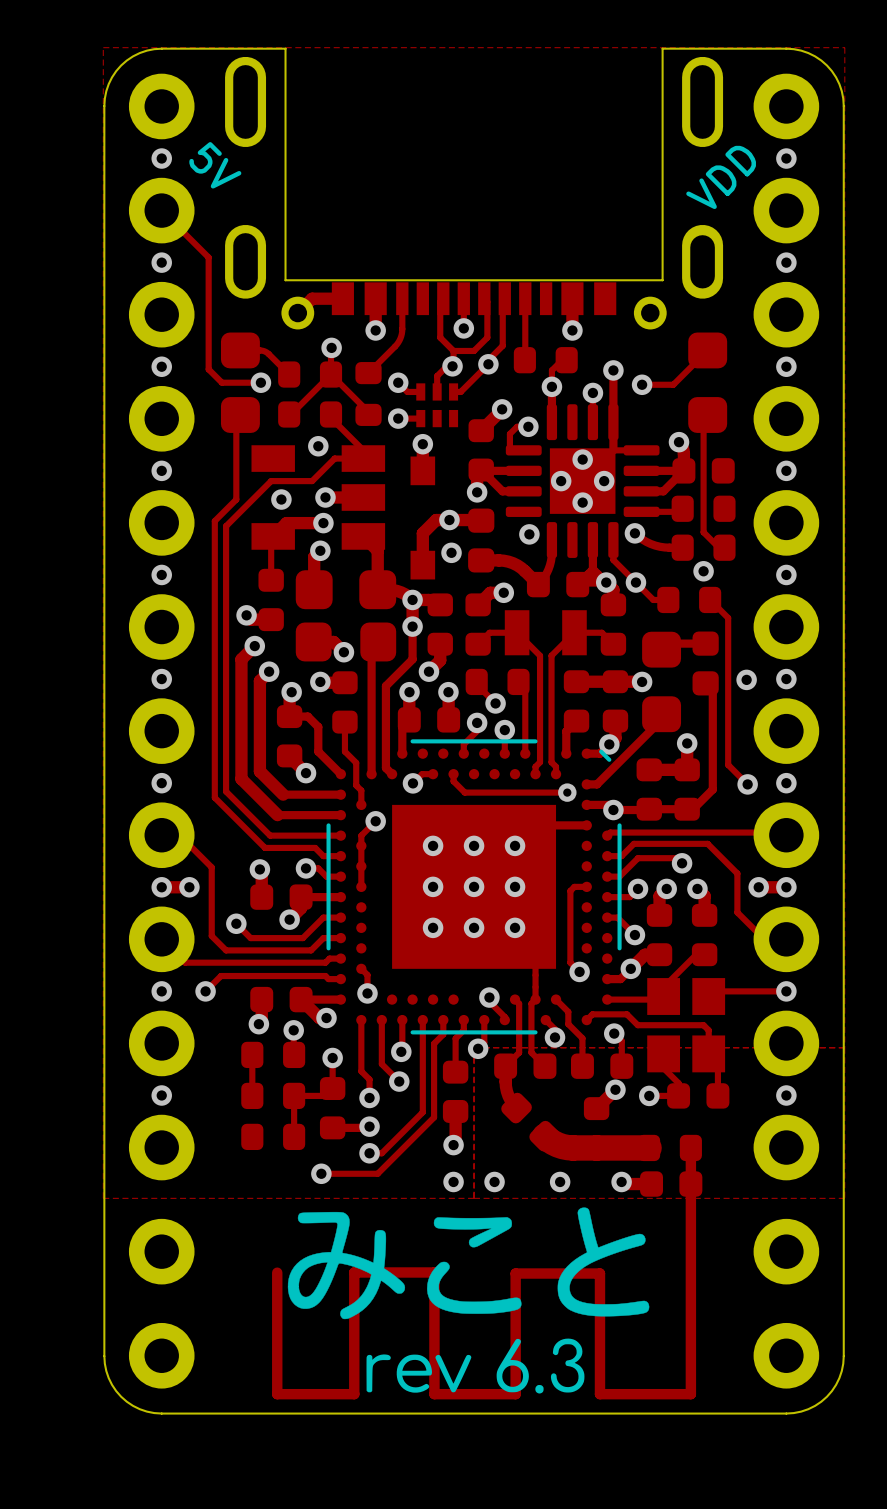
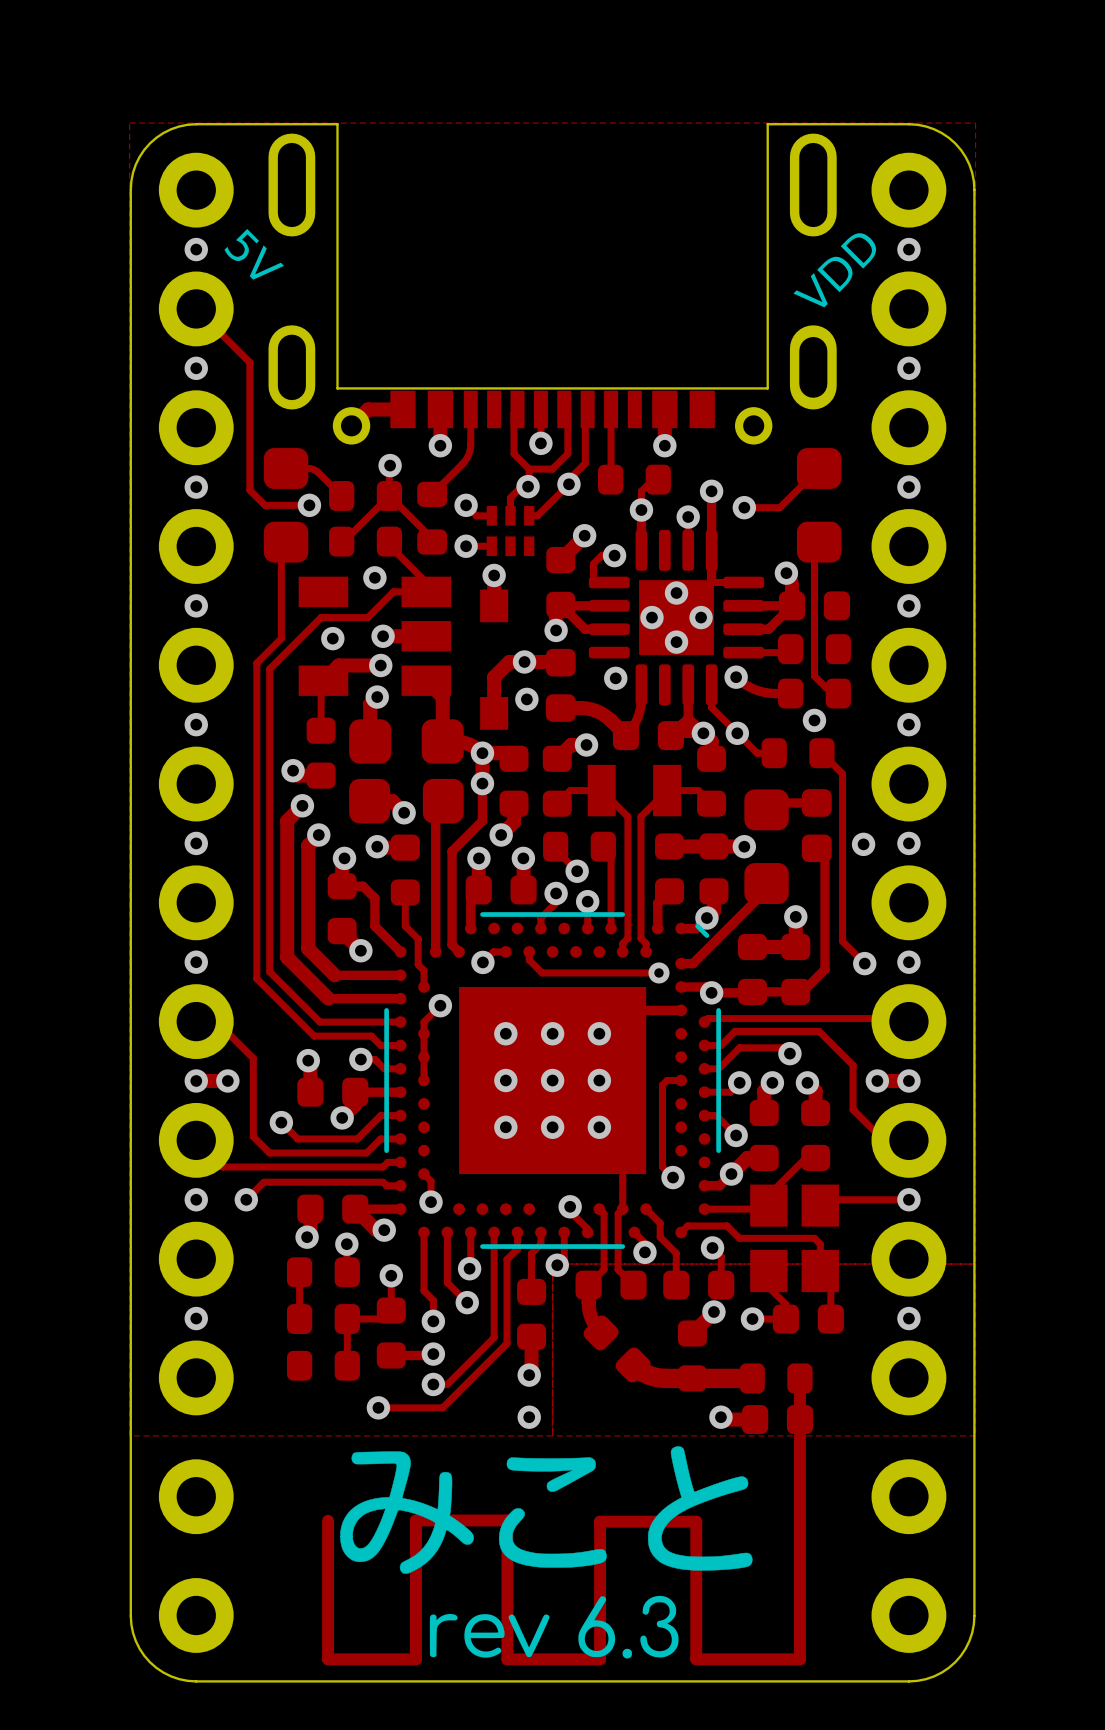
track width: thick (544, 1136) (557, 1144) (567, 1147) (649, 1147) -> thin (633, 1364) (648, 1374) (659, 1378) (752, 1378)
via: (494, 1181) -> none
via: (560, 1181) -> none

